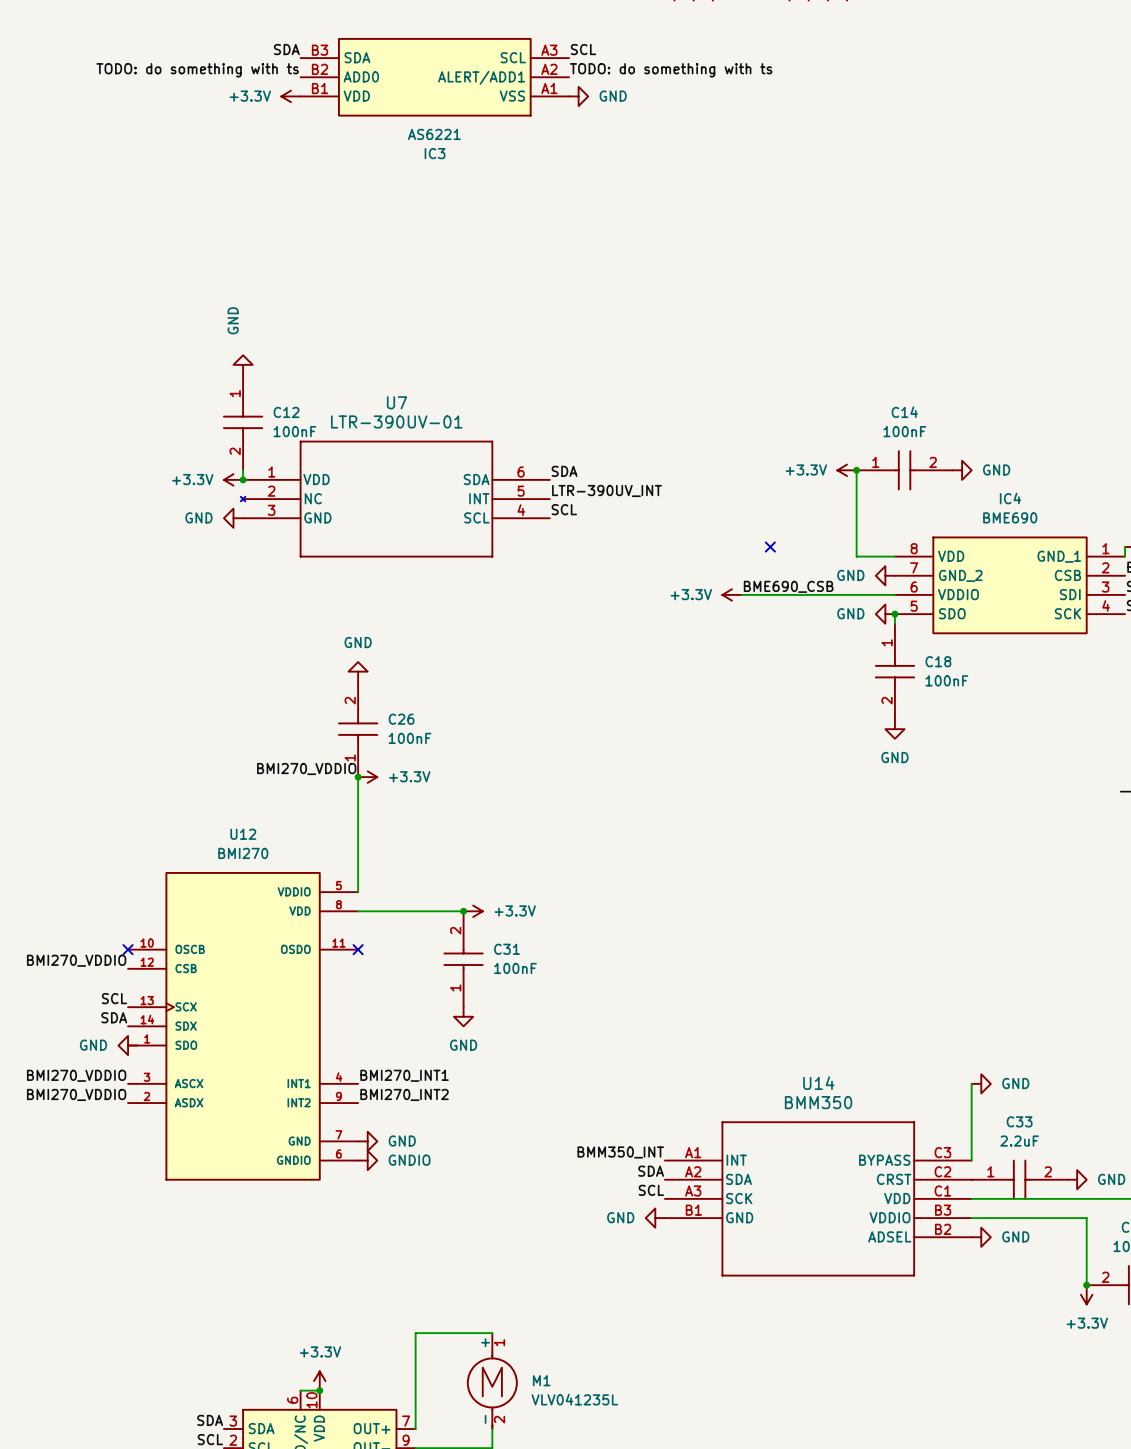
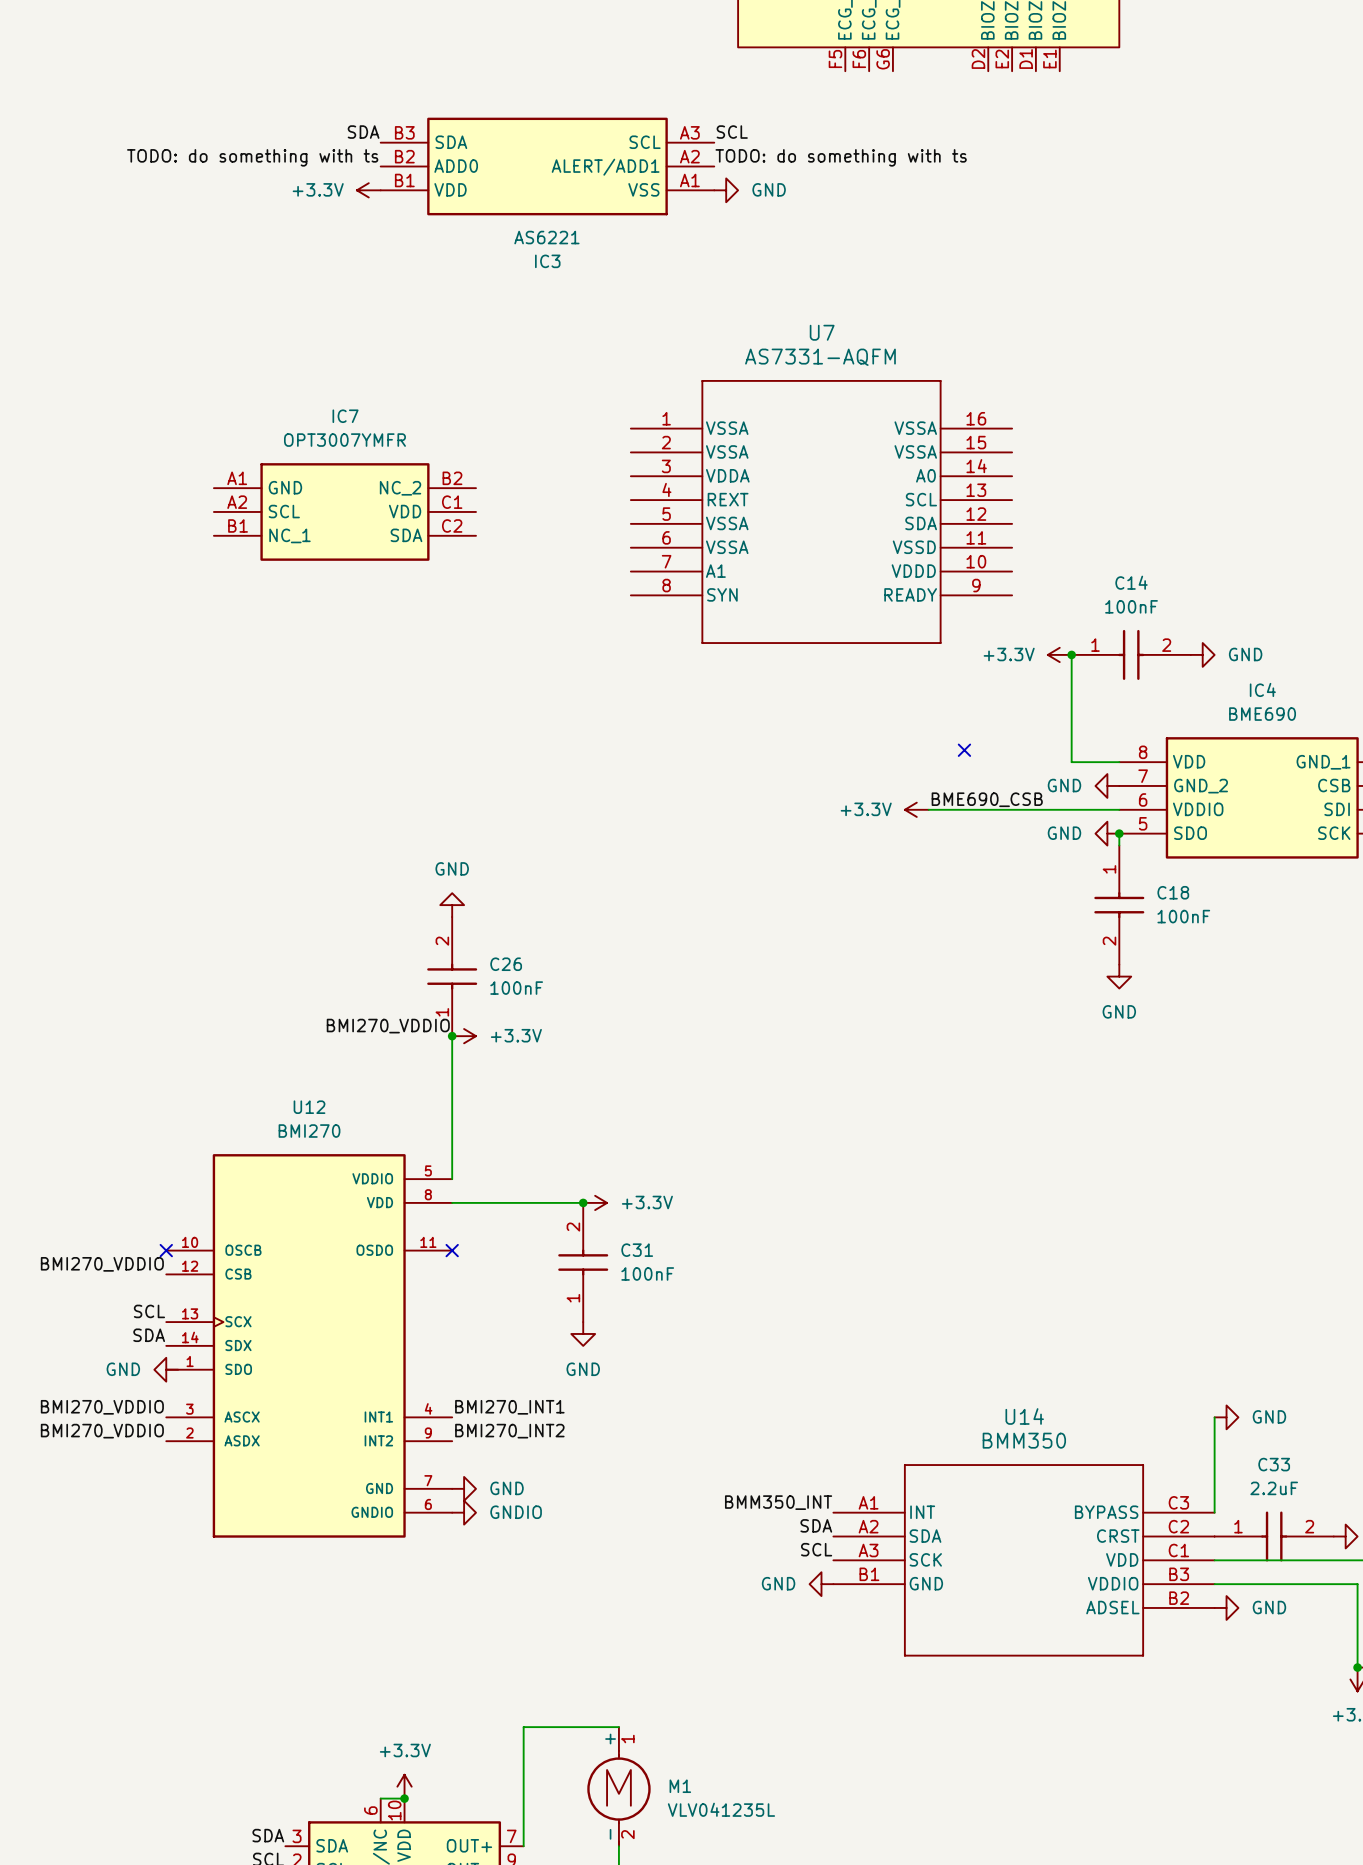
IC7: none -> OPT3007YMFR (344, 511)
power symbol: GND (243, 364) -> none
U7 name position: U7 (397, 402) -> U7 (822, 332)
U7 value: LTR-390UV-01 (396, 421) -> AS7331-AQFM (820, 357)
C12: 100nF (243, 422) -> none
U7 symbol: [240, 441, 550, 558] -> [630, 380, 1013, 644]
wire: (243, 470) (243, 479) -> none
label: SDA (564, 471) -> none
power symbol: +3.3V (233, 479) -> none
junction: (243, 479) -> none
label: LTR-390UV_INT (606, 490) -> none
label: SCL (564, 509) -> none
power symbol: GND (233, 518) -> none

